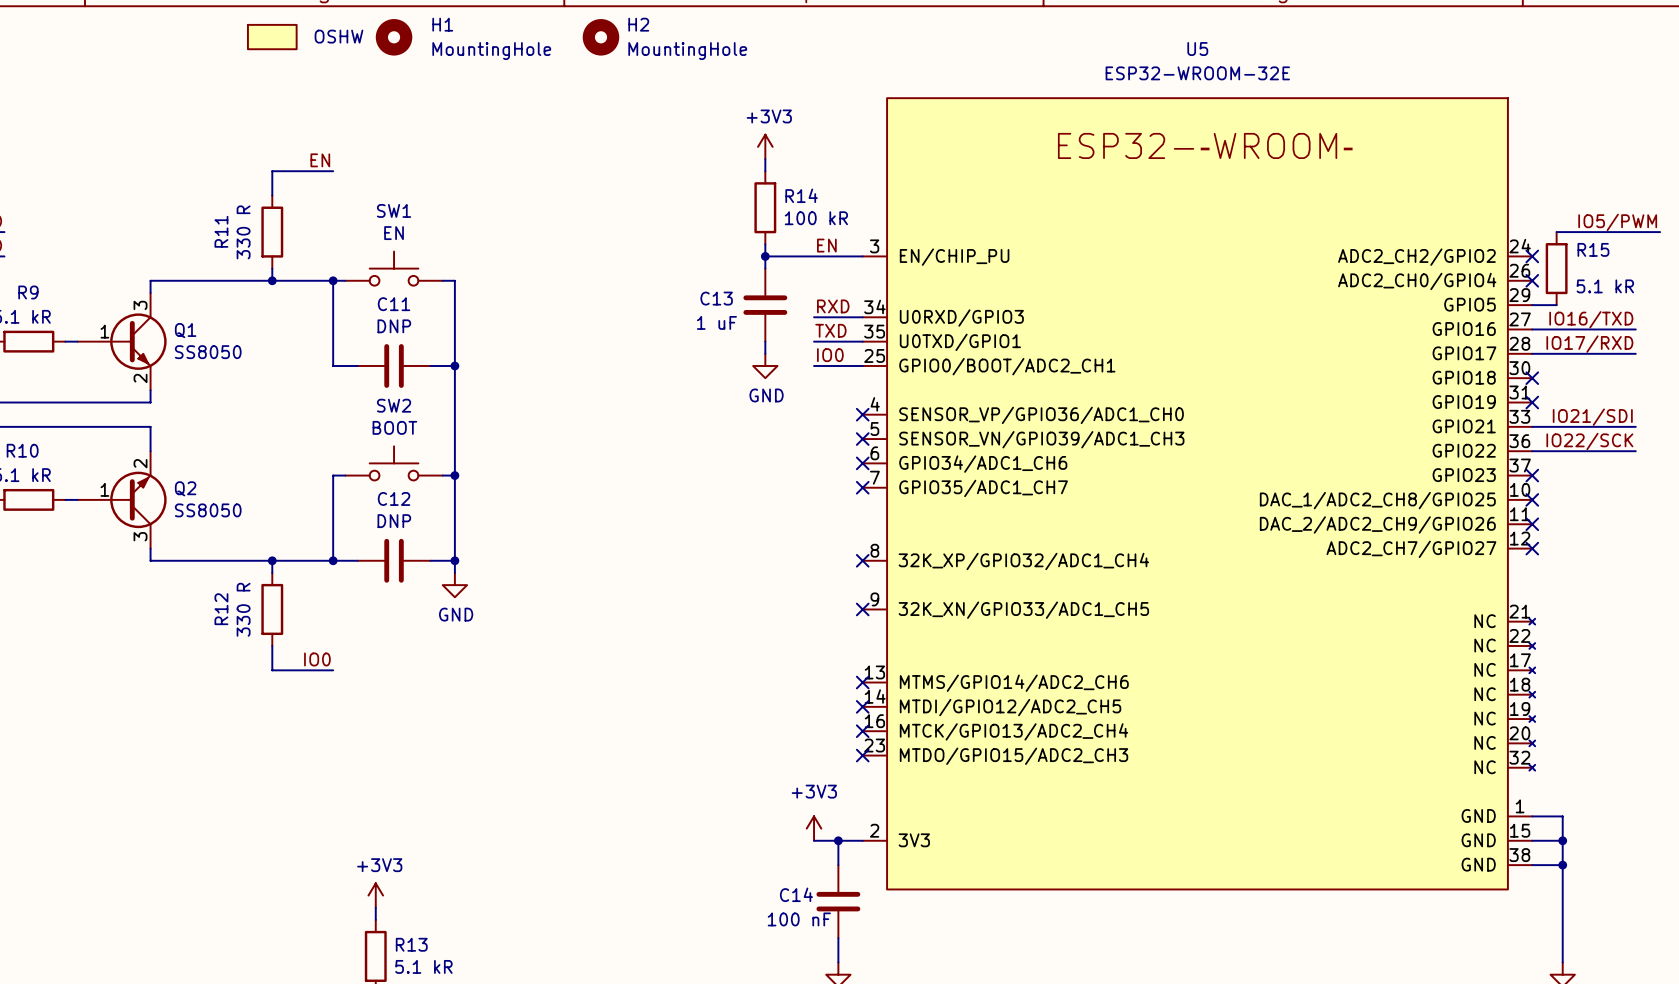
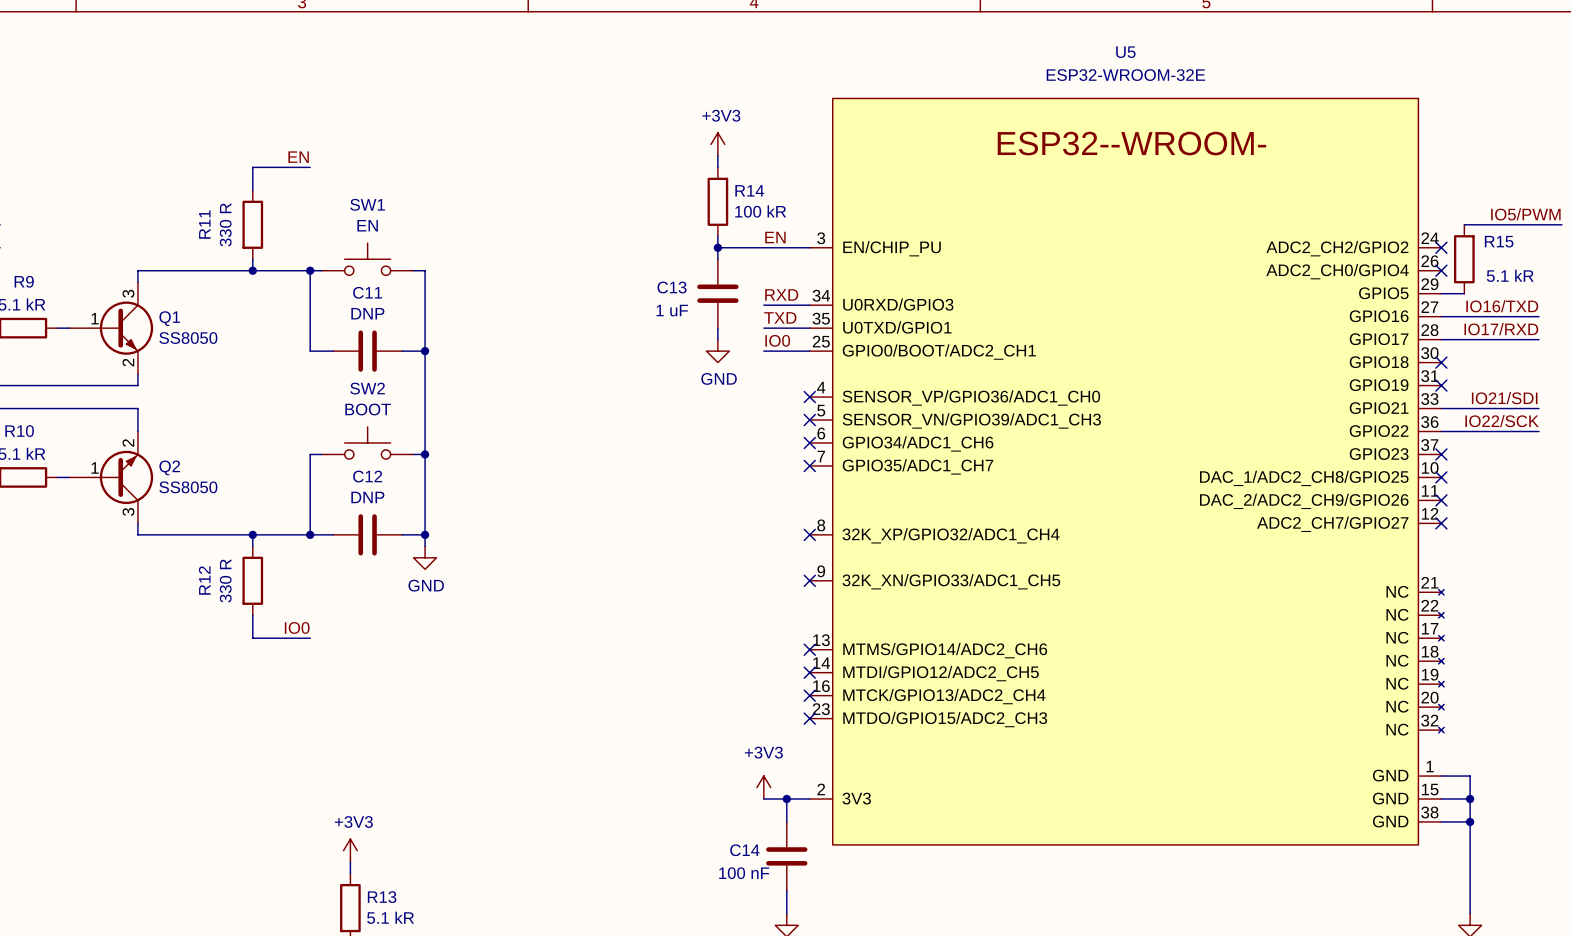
part: OSHW (272, 37) -> none
H1: MountingHole (394, 37) -> none
H2: MountingHole (600, 37) -> none

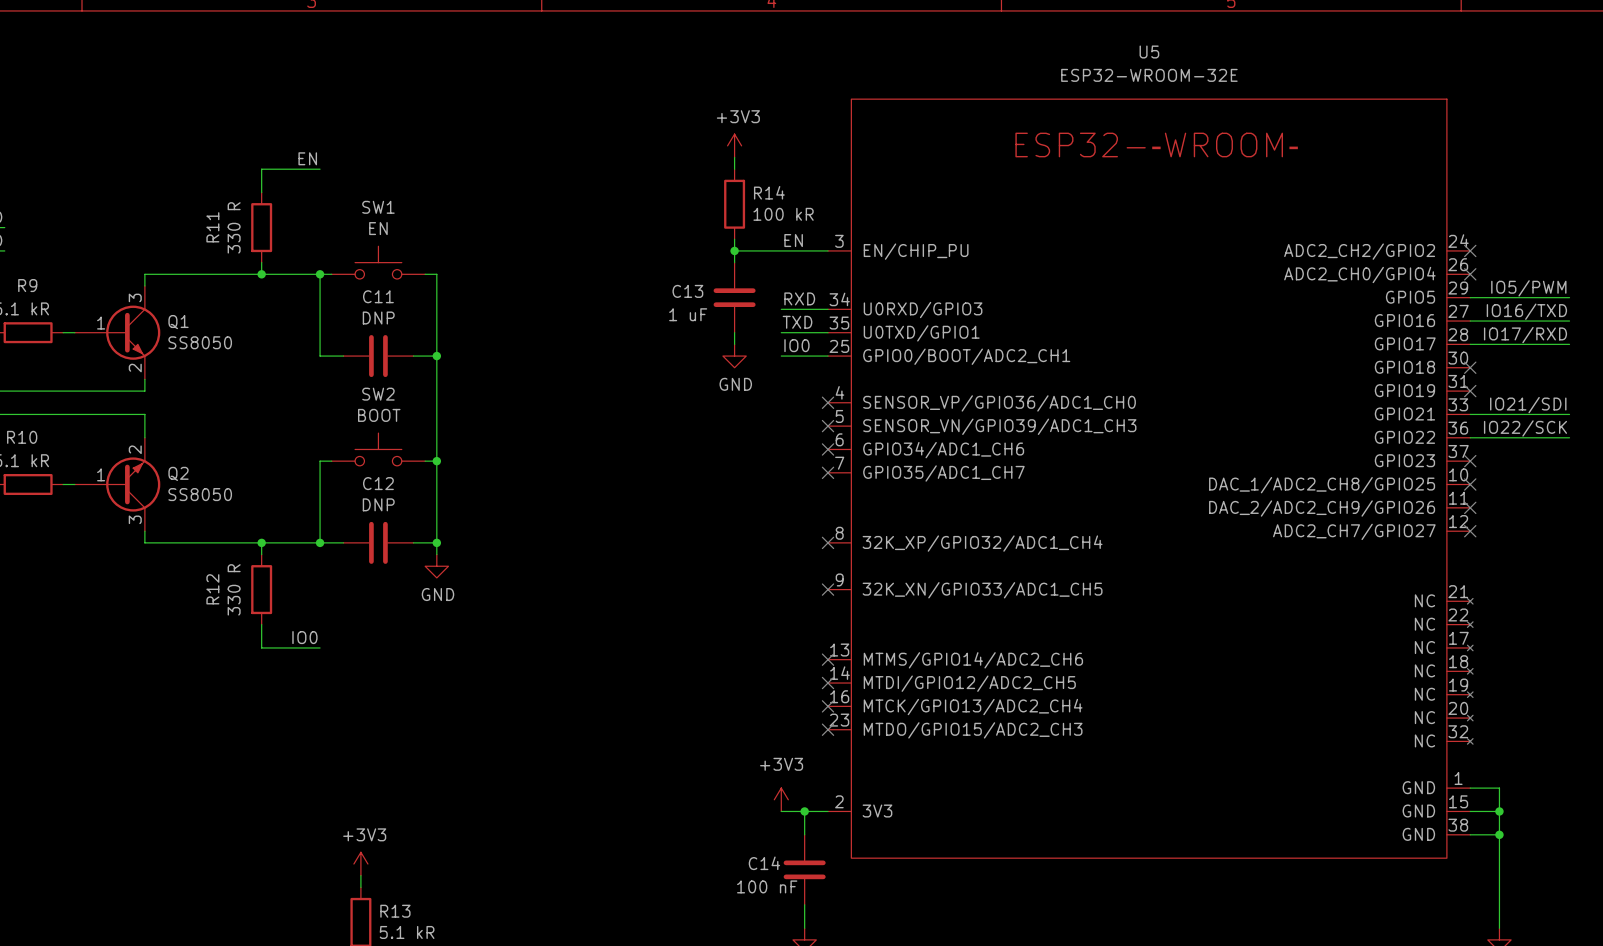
label position: IO5/PWM (1525, 214) -> IO5/PWM (1528, 288)
wire: (1464, 224) (1561, 224) -> none
R15: 5.1 kR (1464, 259) -> none
wire: none -> (1493, 297) (1569, 297)

